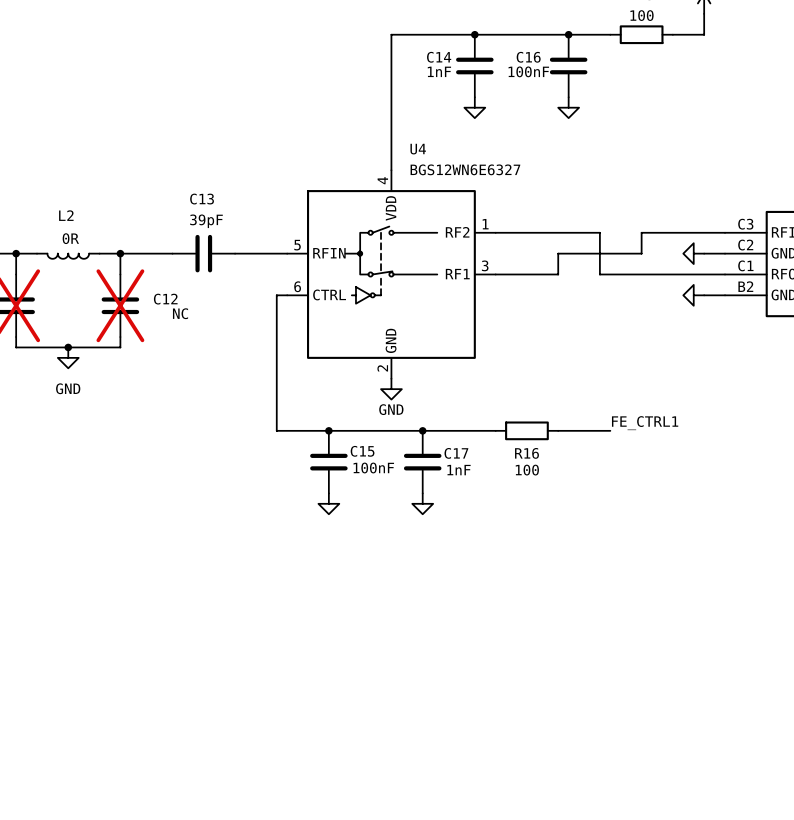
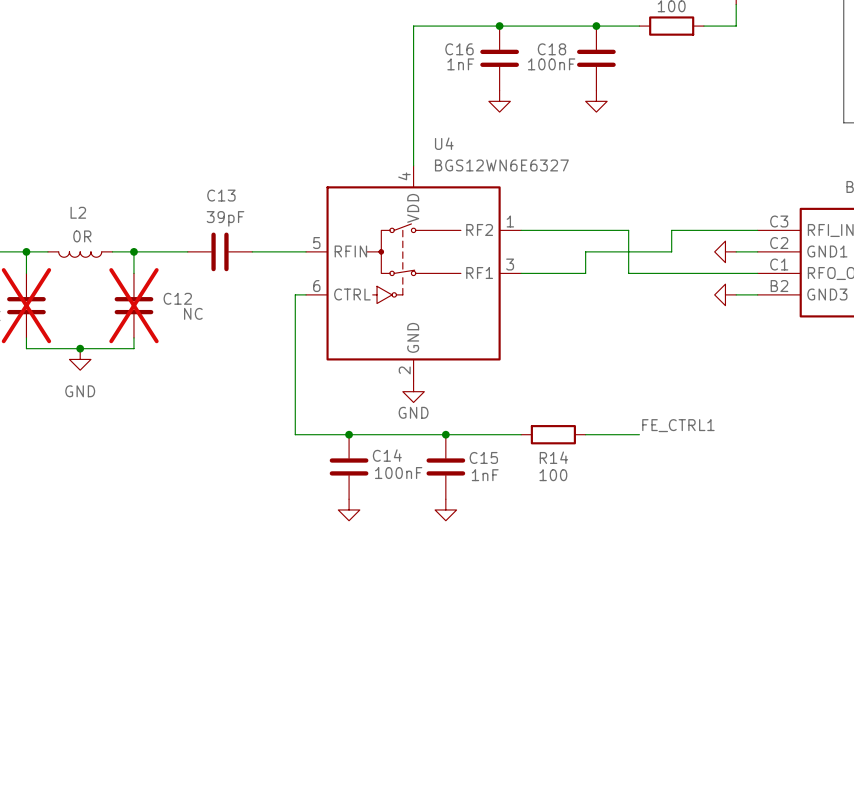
C14 name: C14 (439, 57) -> C16 (459, 49)
C16 name: C16 (528, 57) -> C18 (551, 49)
C15 name: C15 (362, 451) -> C14 (387, 455)
C17 name: C17 (456, 453) -> C15 (483, 457)
R16 name: R16 (526, 453) -> R14 (553, 457)

